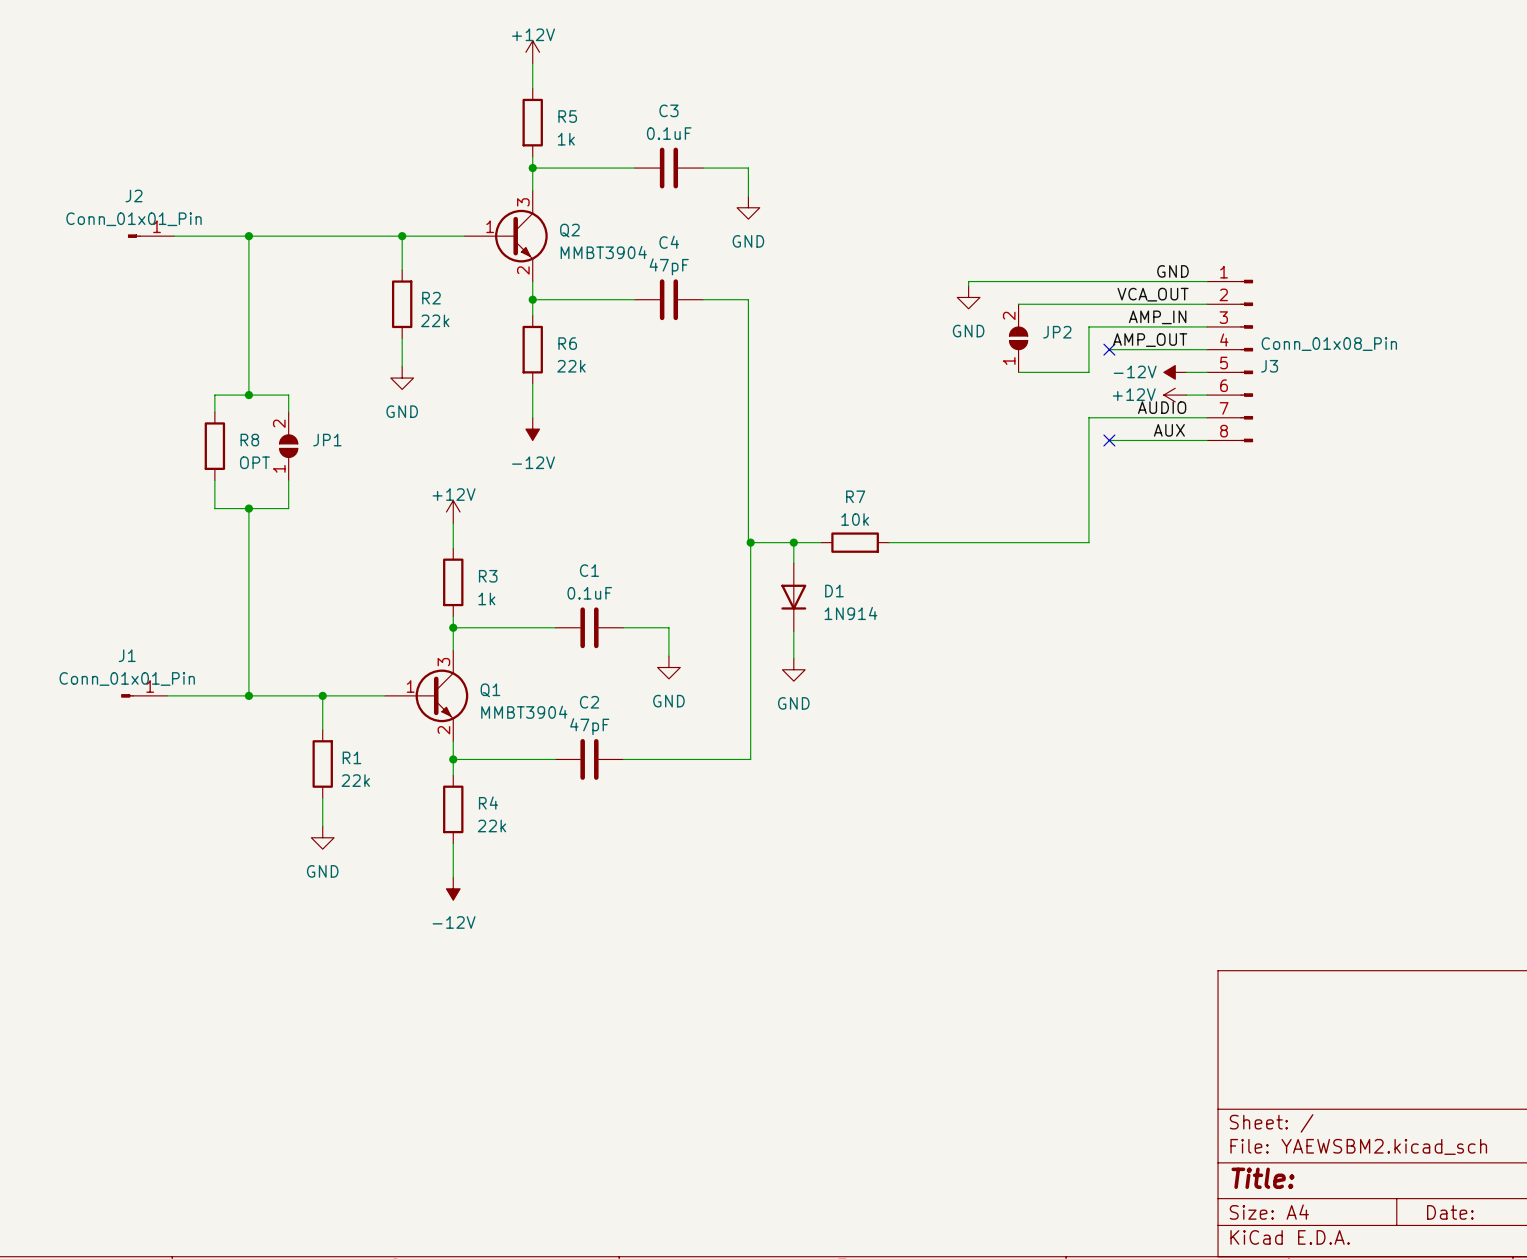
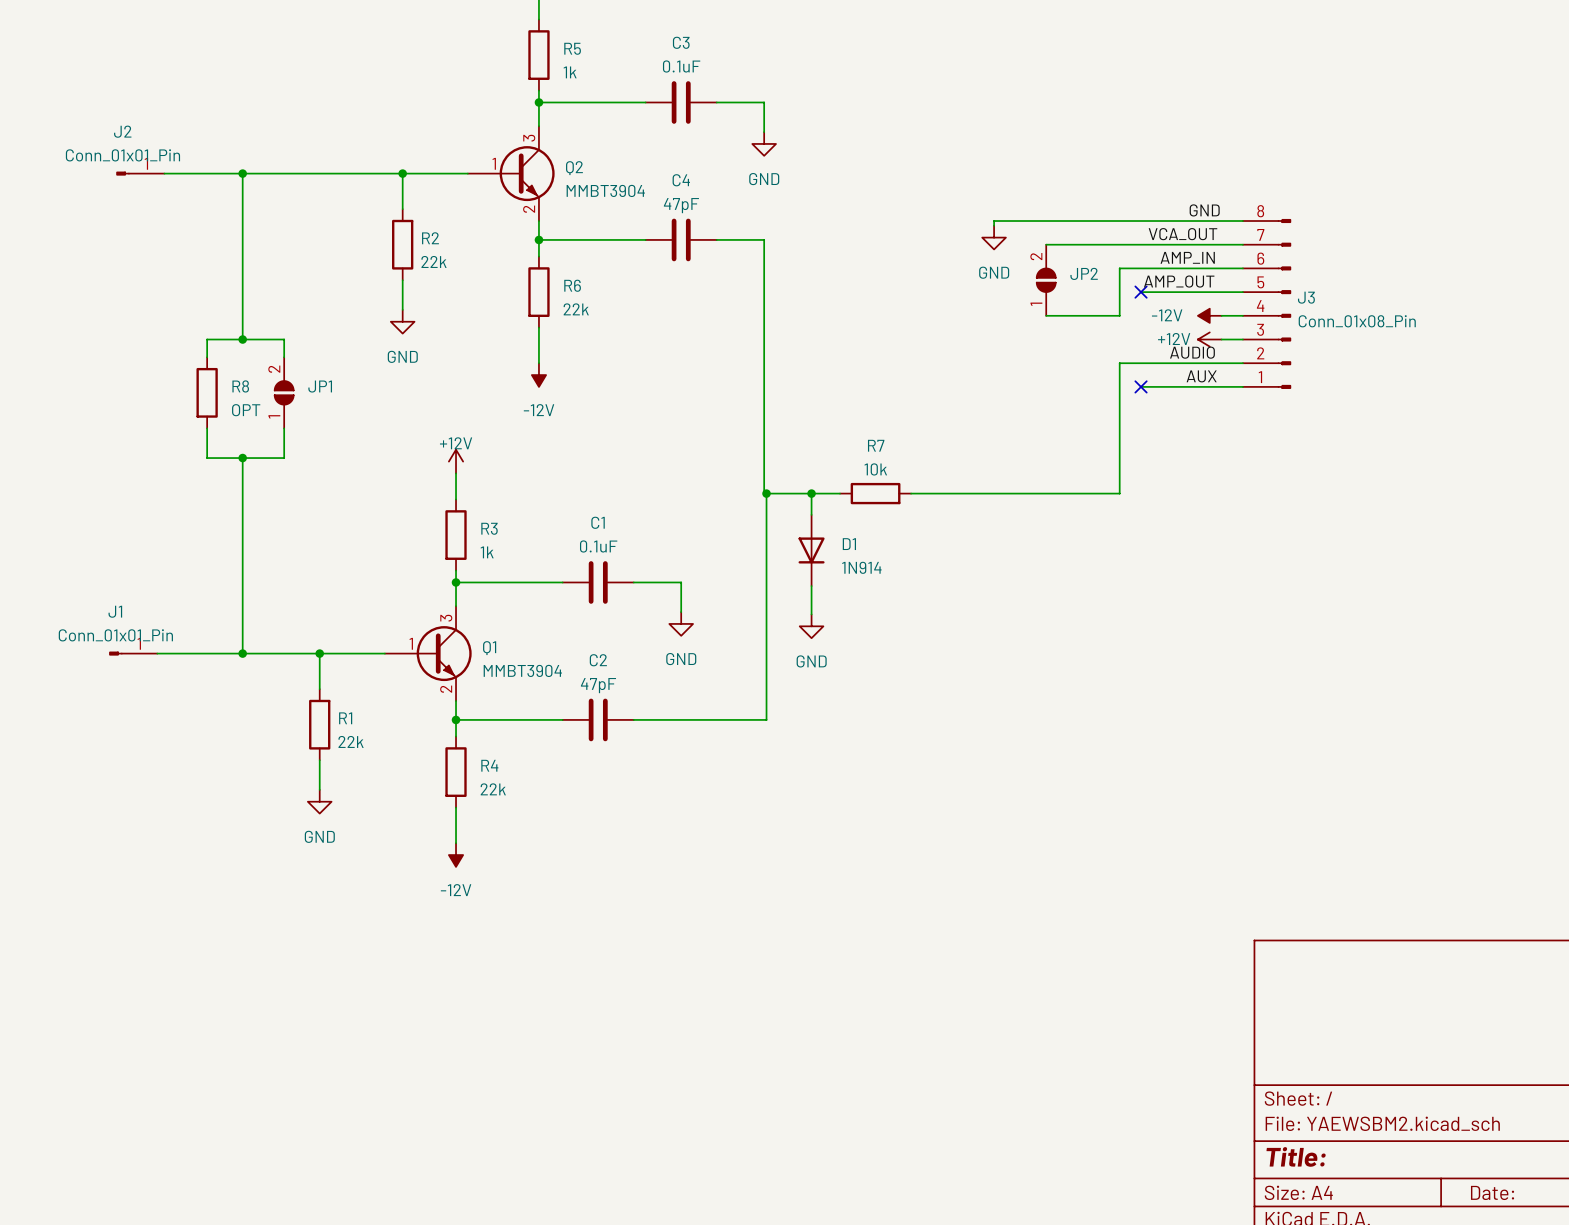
J3 flip: as is (1246, 361) -> up-down (1284, 303)

